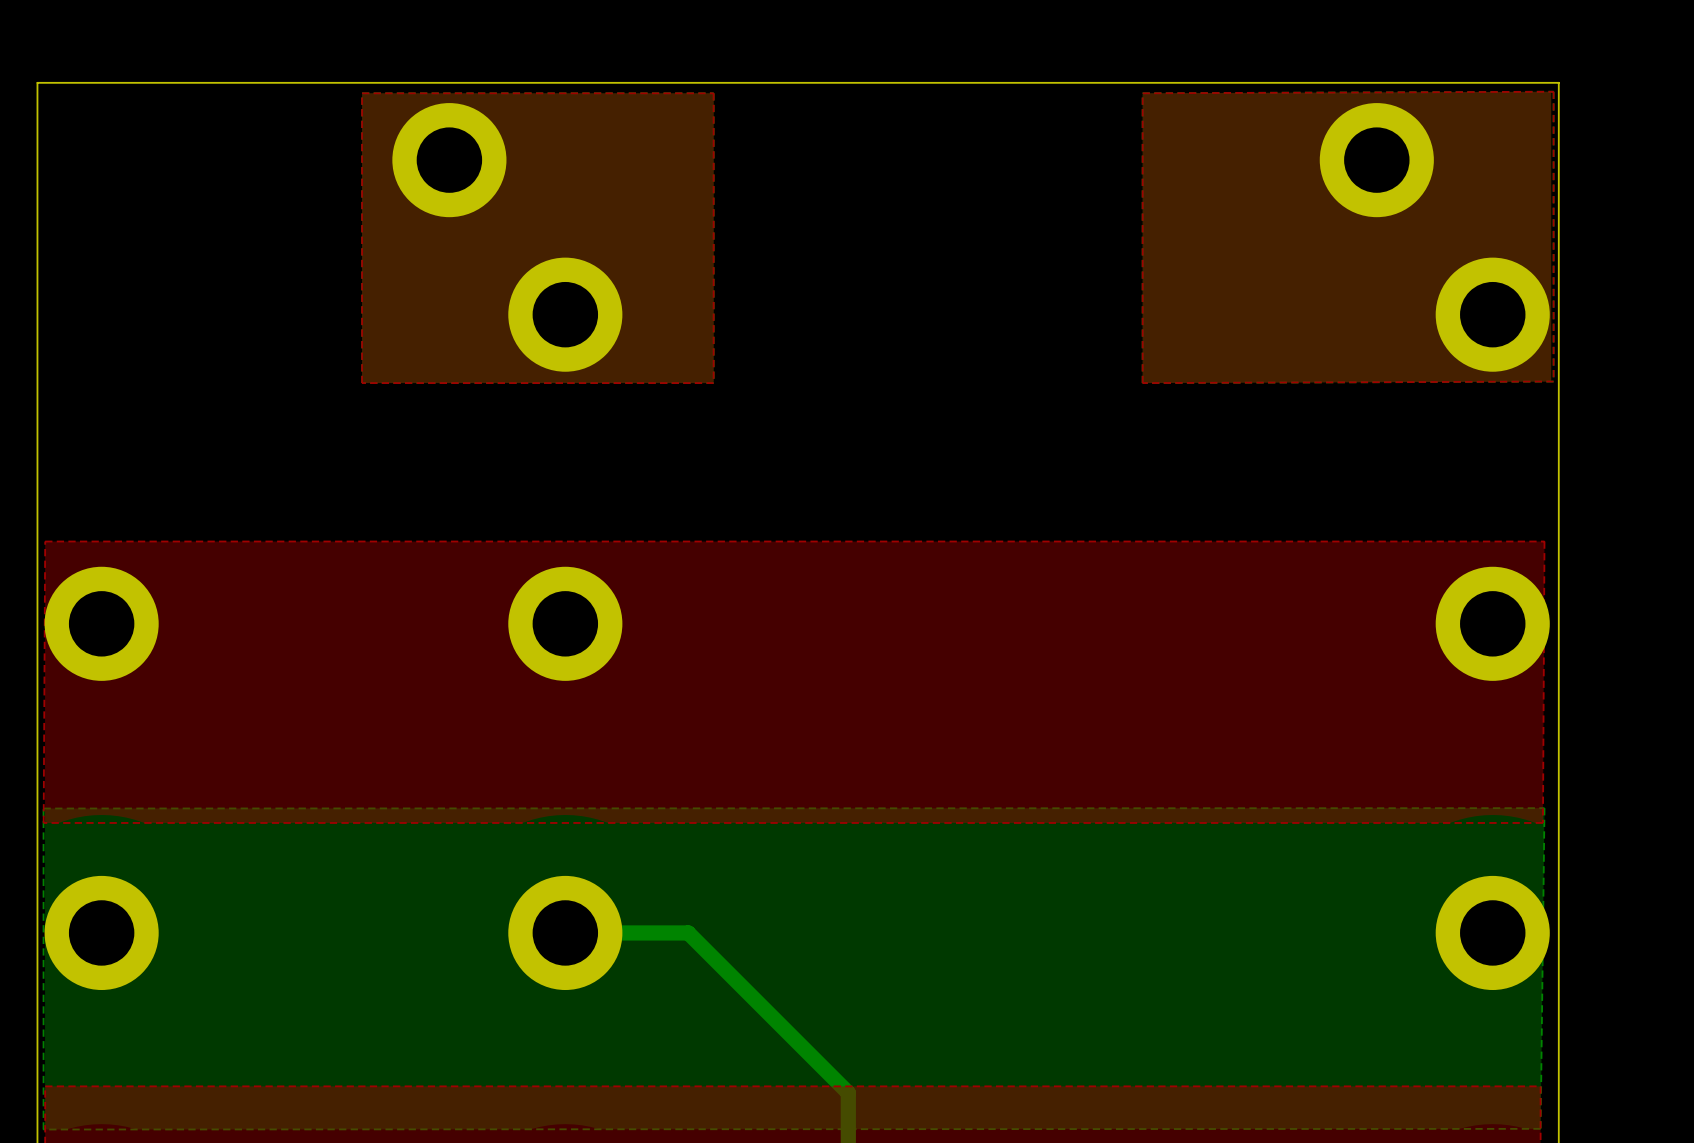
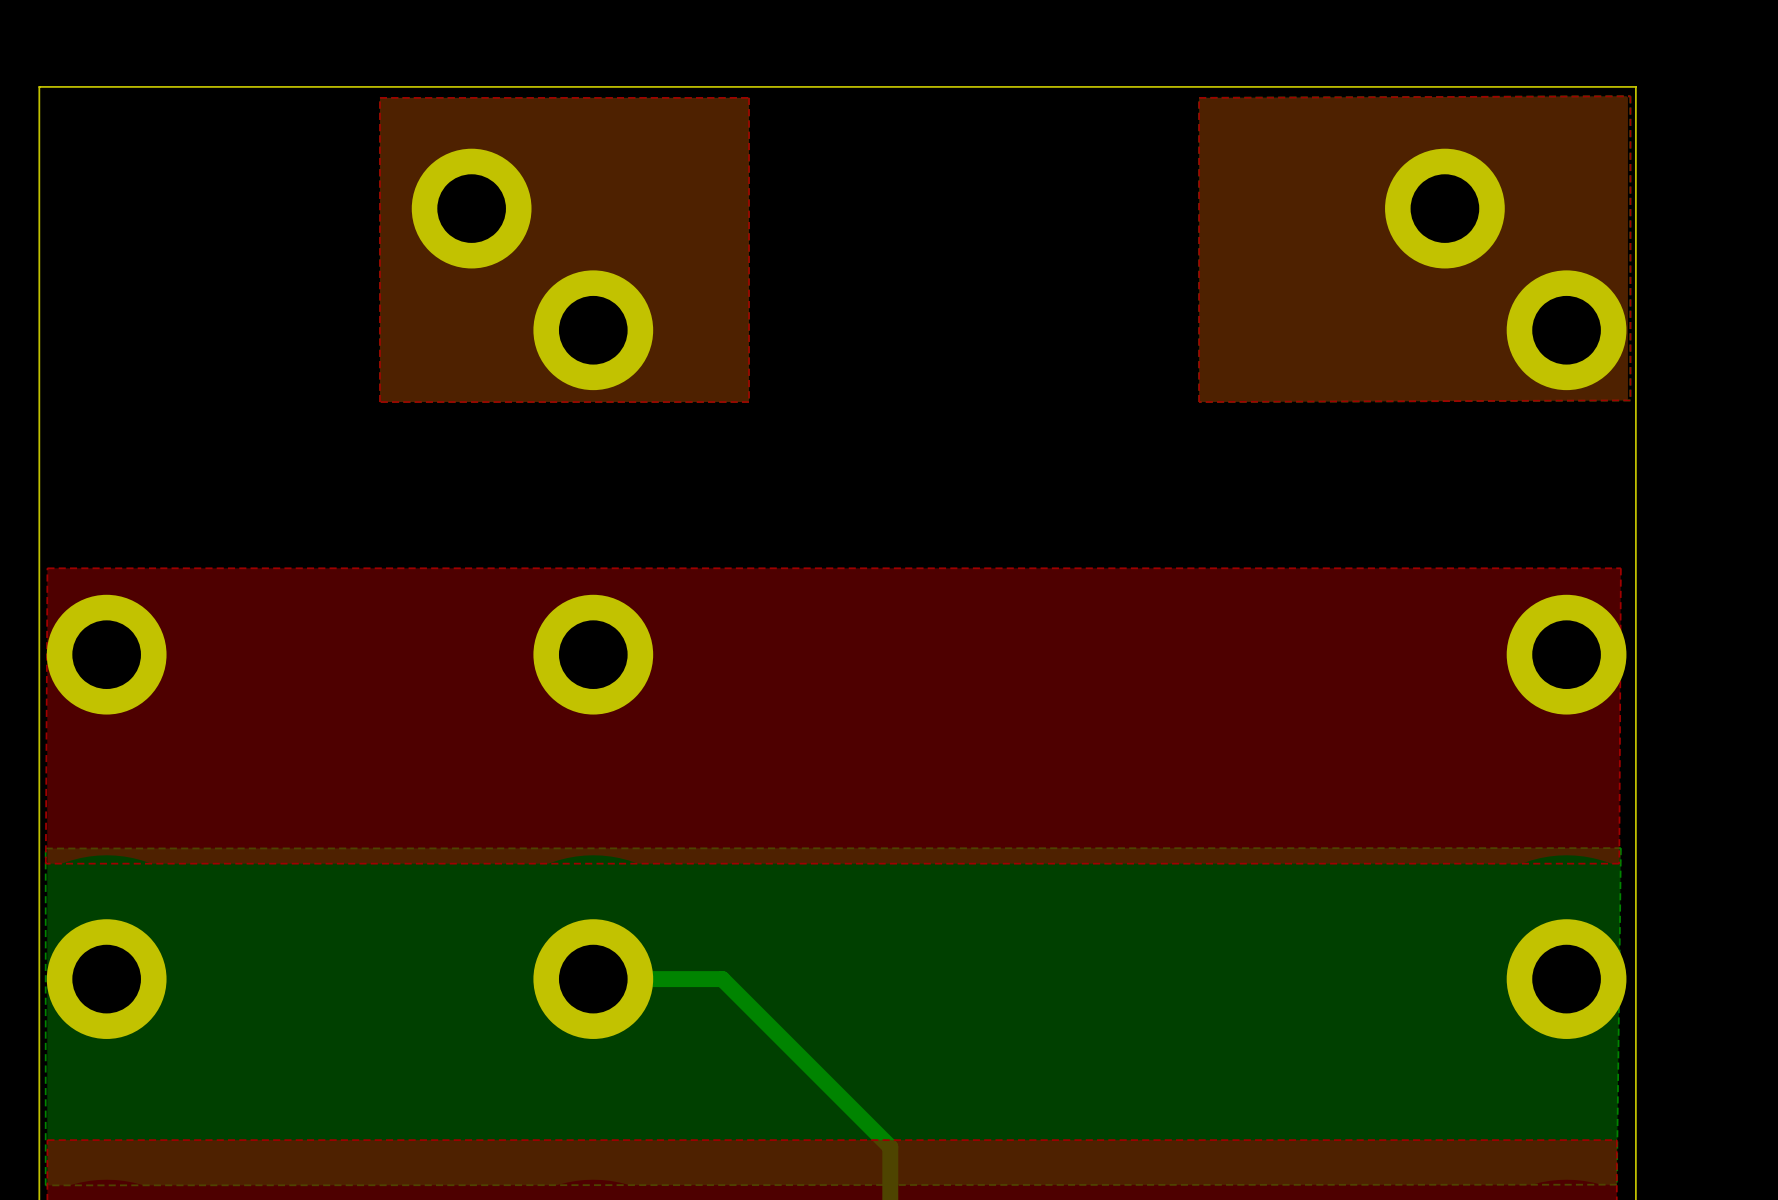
part position: (449, 160) -> (471, 208)
part position: (1376, 160) -> (1444, 208)

